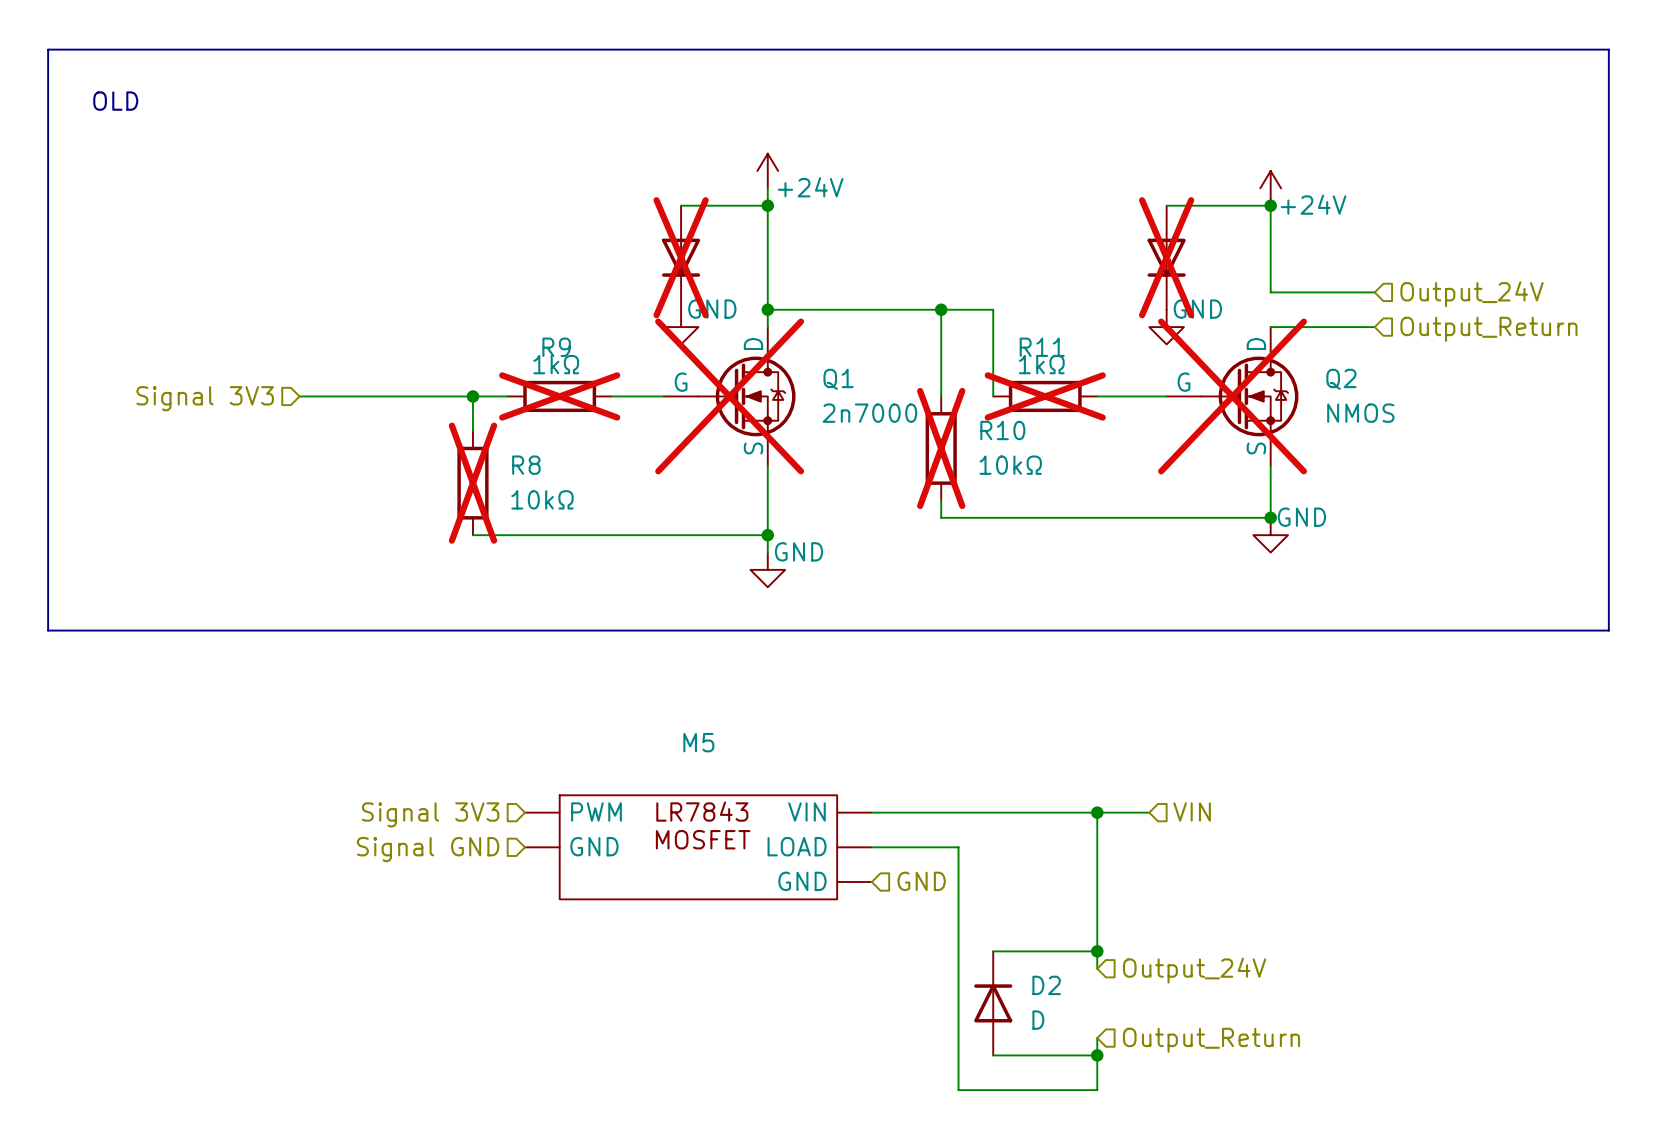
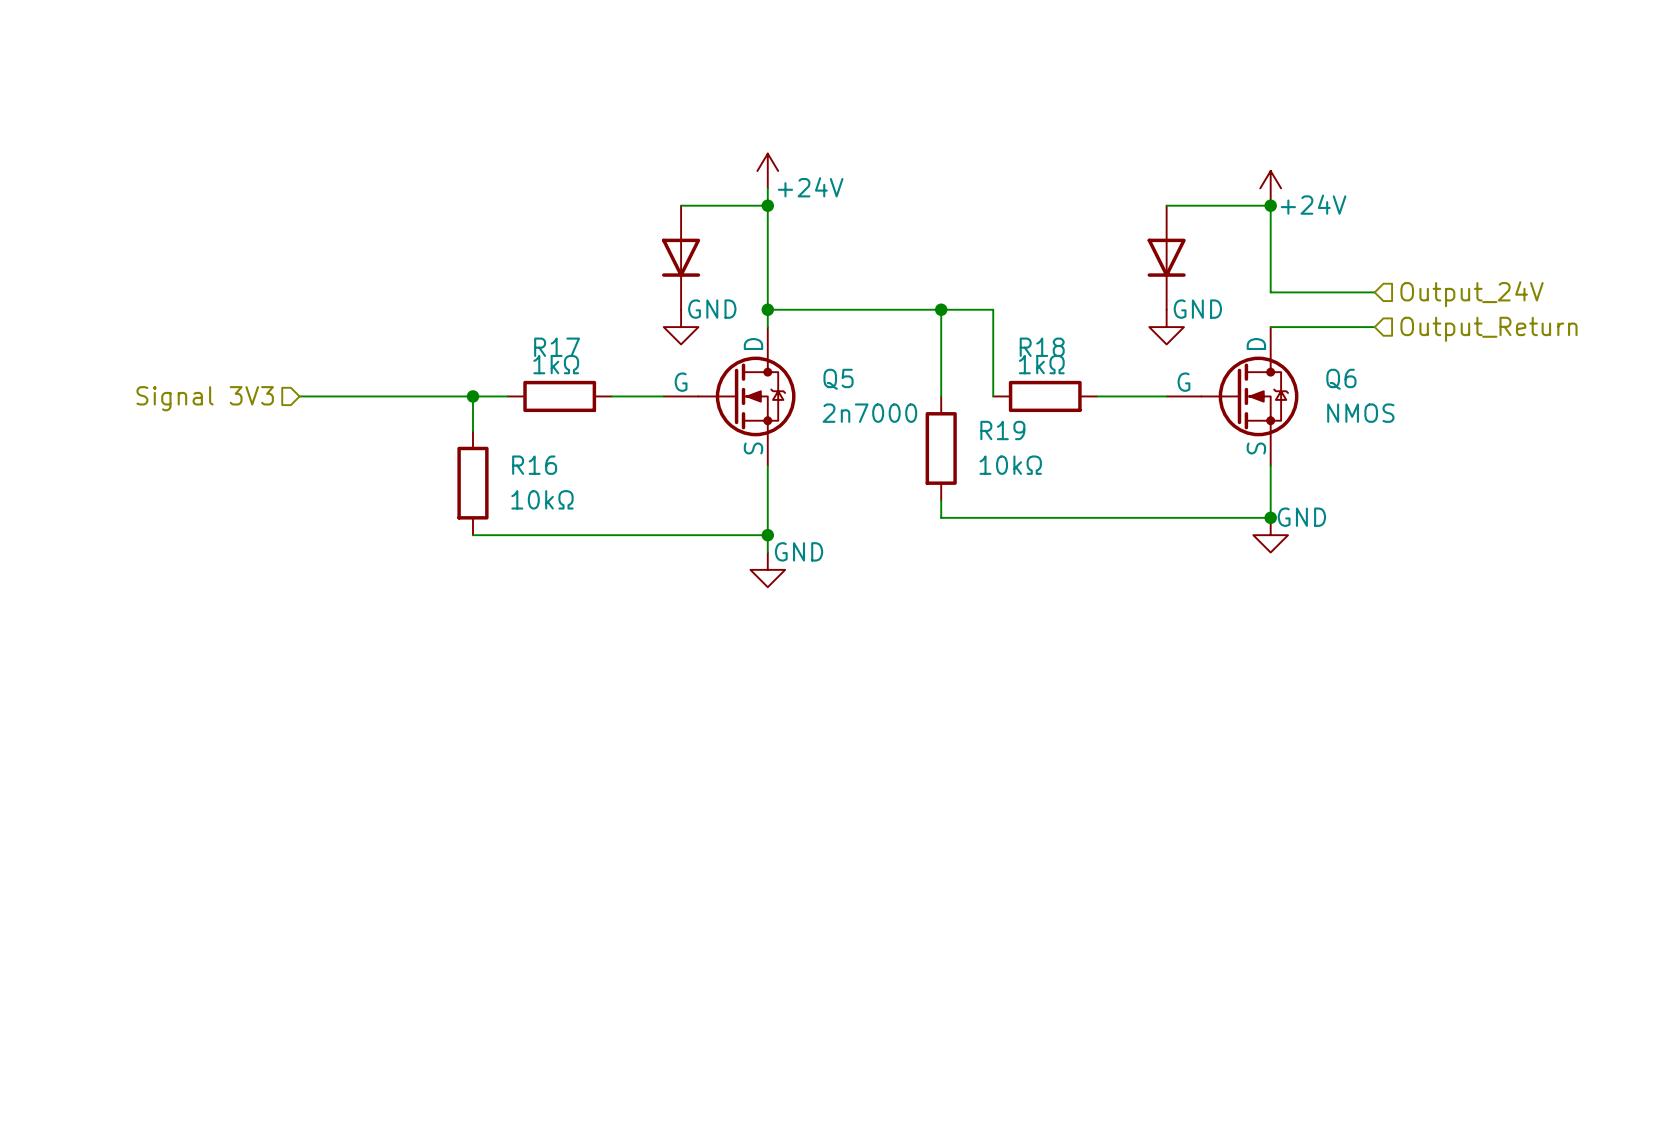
line: (48, 49) (1608, 49) (1608, 630) (48, 630) (48, 49) -> none
text: OLD (115, 101) -> none
part do-not-place cross: (681, 257) -> none
part do-not-place cross: (1166, 257) -> none
R9 name: R9 (556, 347) -> R17 (557, 347)
R11 name: R11 (1042, 347) -> R18 (1042, 347)
Q1 name: Q1 (838, 379) -> Q5 (838, 379)
Q2 name: Q2 (1341, 379) -> Q6 (1341, 379)
R9 do-not-place cross: (559, 396) -> none
Q1 do-not-place cross: (729, 396) -> none
R11 do-not-place cross: (1045, 396) -> none
Q2 do-not-place cross: (1232, 396) -> none
R10 name: R10 (1002, 430) -> R19 (1002, 430)
R10 do-not-place cross: (941, 448) -> none
R8 name: R8 (526, 465) -> R16 (534, 465)
R8 do-not-place cross: (472, 483) -> none
hierarchical label: VIN (1192, 811) -> none
wire: (871, 812) (1149, 812) -> none
wire: (1097, 812) (1097, 968) -> none
junction: (1097, 812) -> none
hierarchical label: Signal 3V3 (430, 814) -> none
M5: (698, 847) -> none
wire: (871, 847) (958, 847) (958, 1090) (1097, 1090) (1097, 1038) -> none
hierarchical label: Signal GND (428, 849) -> none
hierarchical label: GND (921, 881) -> none
wire: (993, 951) (1097, 951) -> none
junction: (1097, 951) -> none
hierarchical label: Output_24V (1194, 970) -> none
D2: D (993, 1003) -> none
hierarchical label: Output_Return (1211, 1040) -> none
wire: (993, 1055) (1097, 1055) -> none
junction: (1097, 1055) -> none

